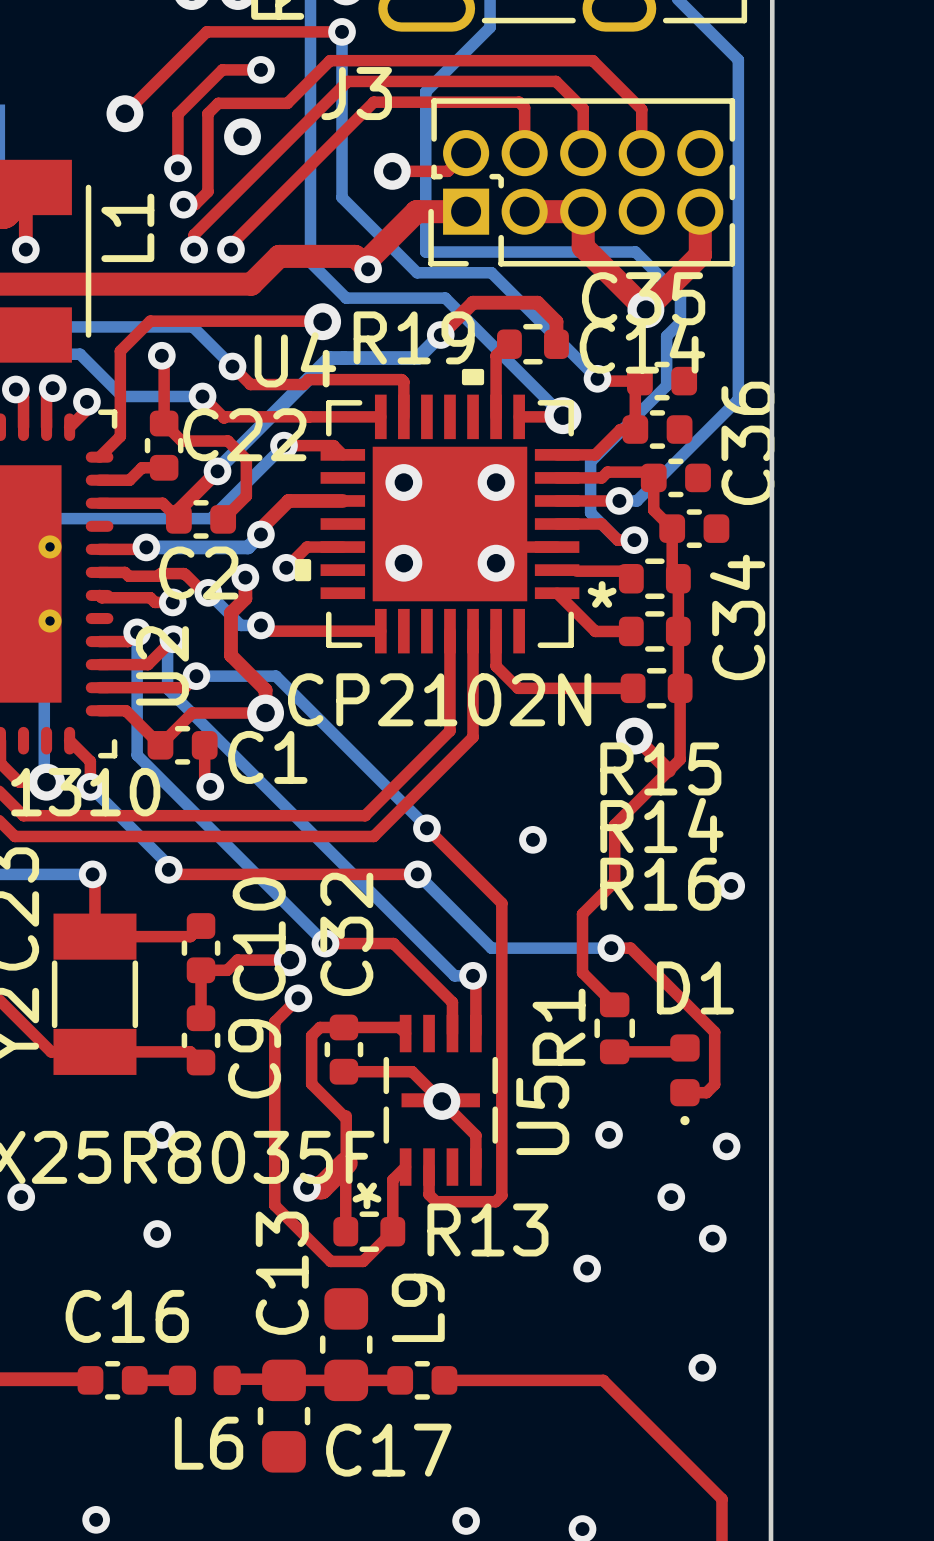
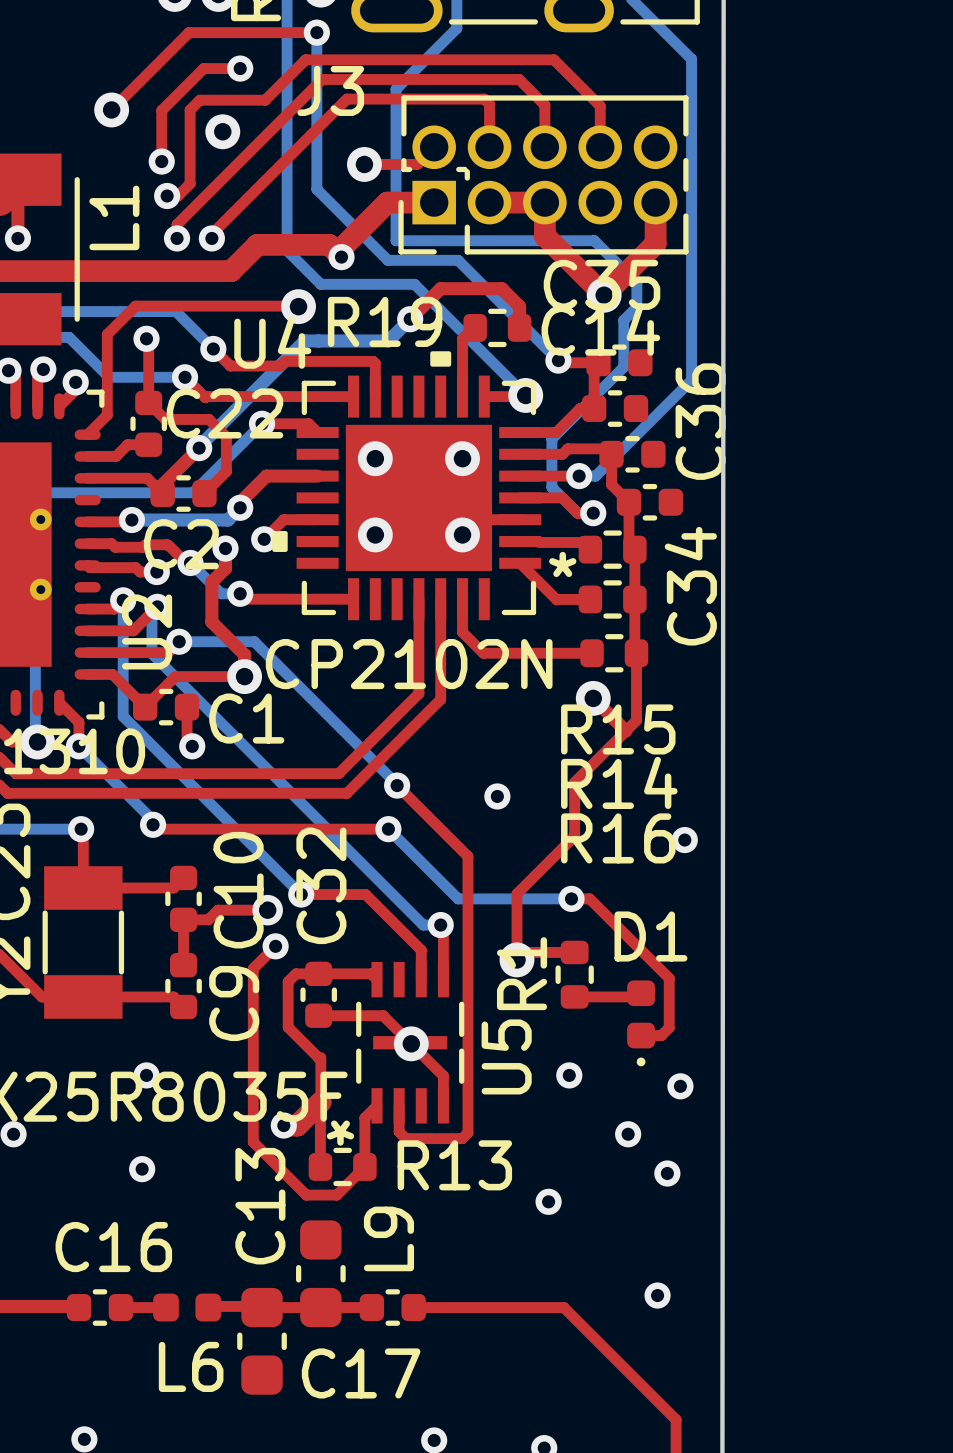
top track: (582, 914) (582, 972) (614, 1004) -> (544, 866) (516, 893) (516, 959) (524, 952) (574, 952)
via: none -> (516, 959)

